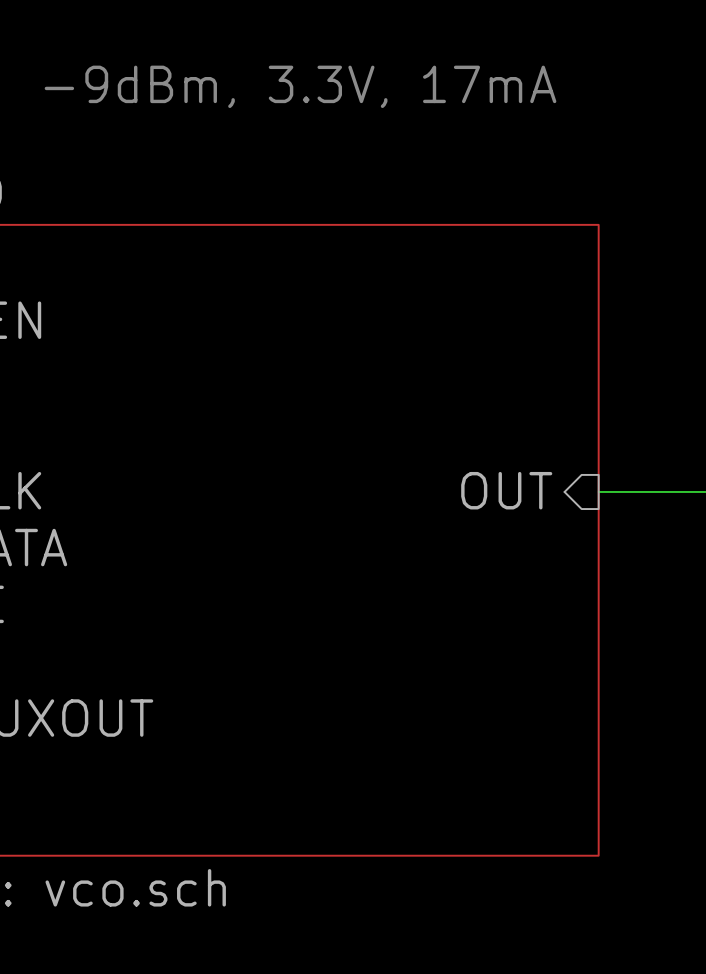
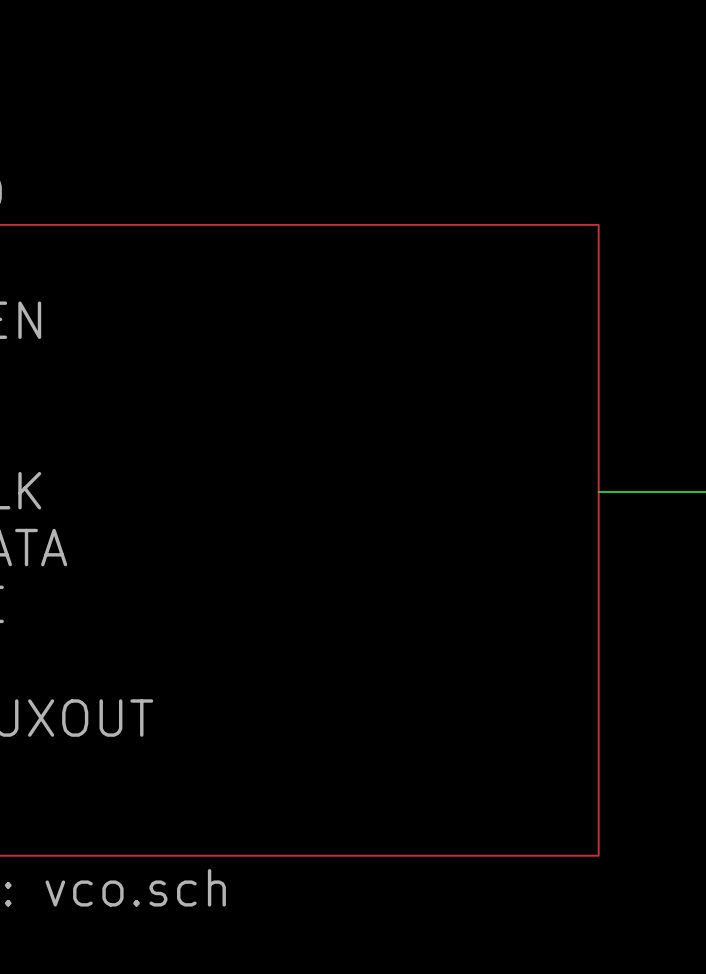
text: -9dBm, 3.3V, 17mA (300, 86) -> none
sheet pin: OUT (506, 490) -> none

